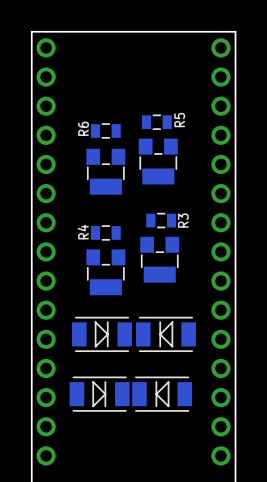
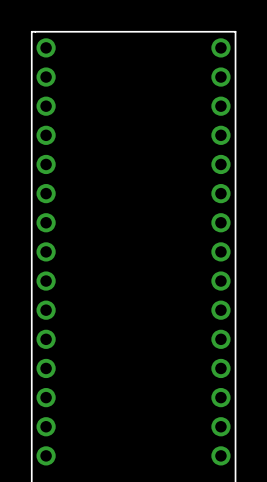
R5: (156, 122) -> none
R6: (105, 130) -> none
part: (158, 161) -> none
part: (105, 171) -> none
R3: (161, 220) -> none
R4: (105, 232) -> none
part: (159, 259) -> none
part: (105, 272) -> none
part: (102, 334) -> none
part: (165, 334) -> none
part: (99, 394) -> none
part: (162, 394) -> none

